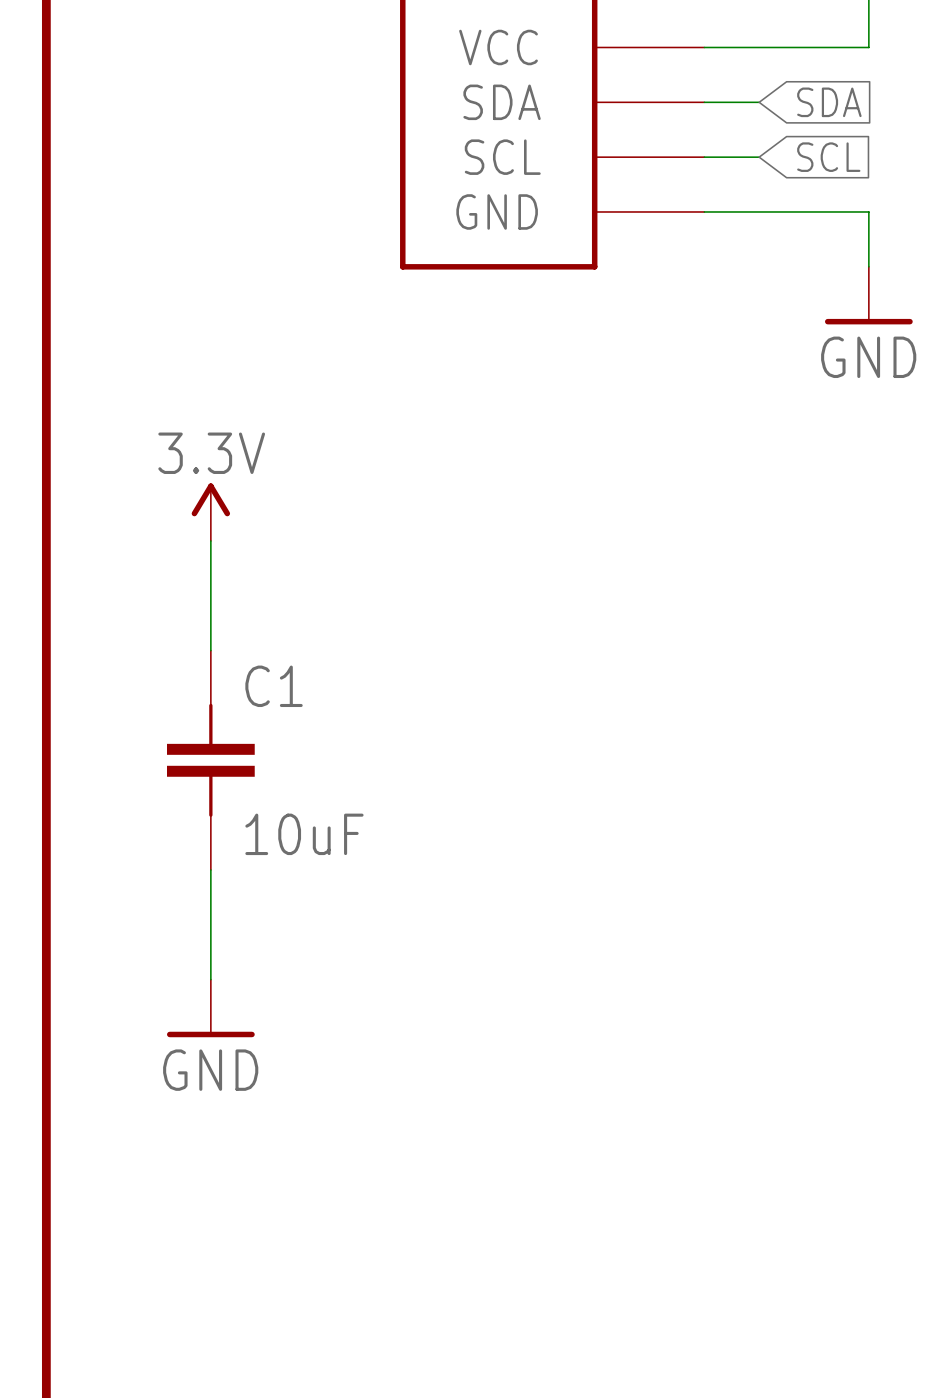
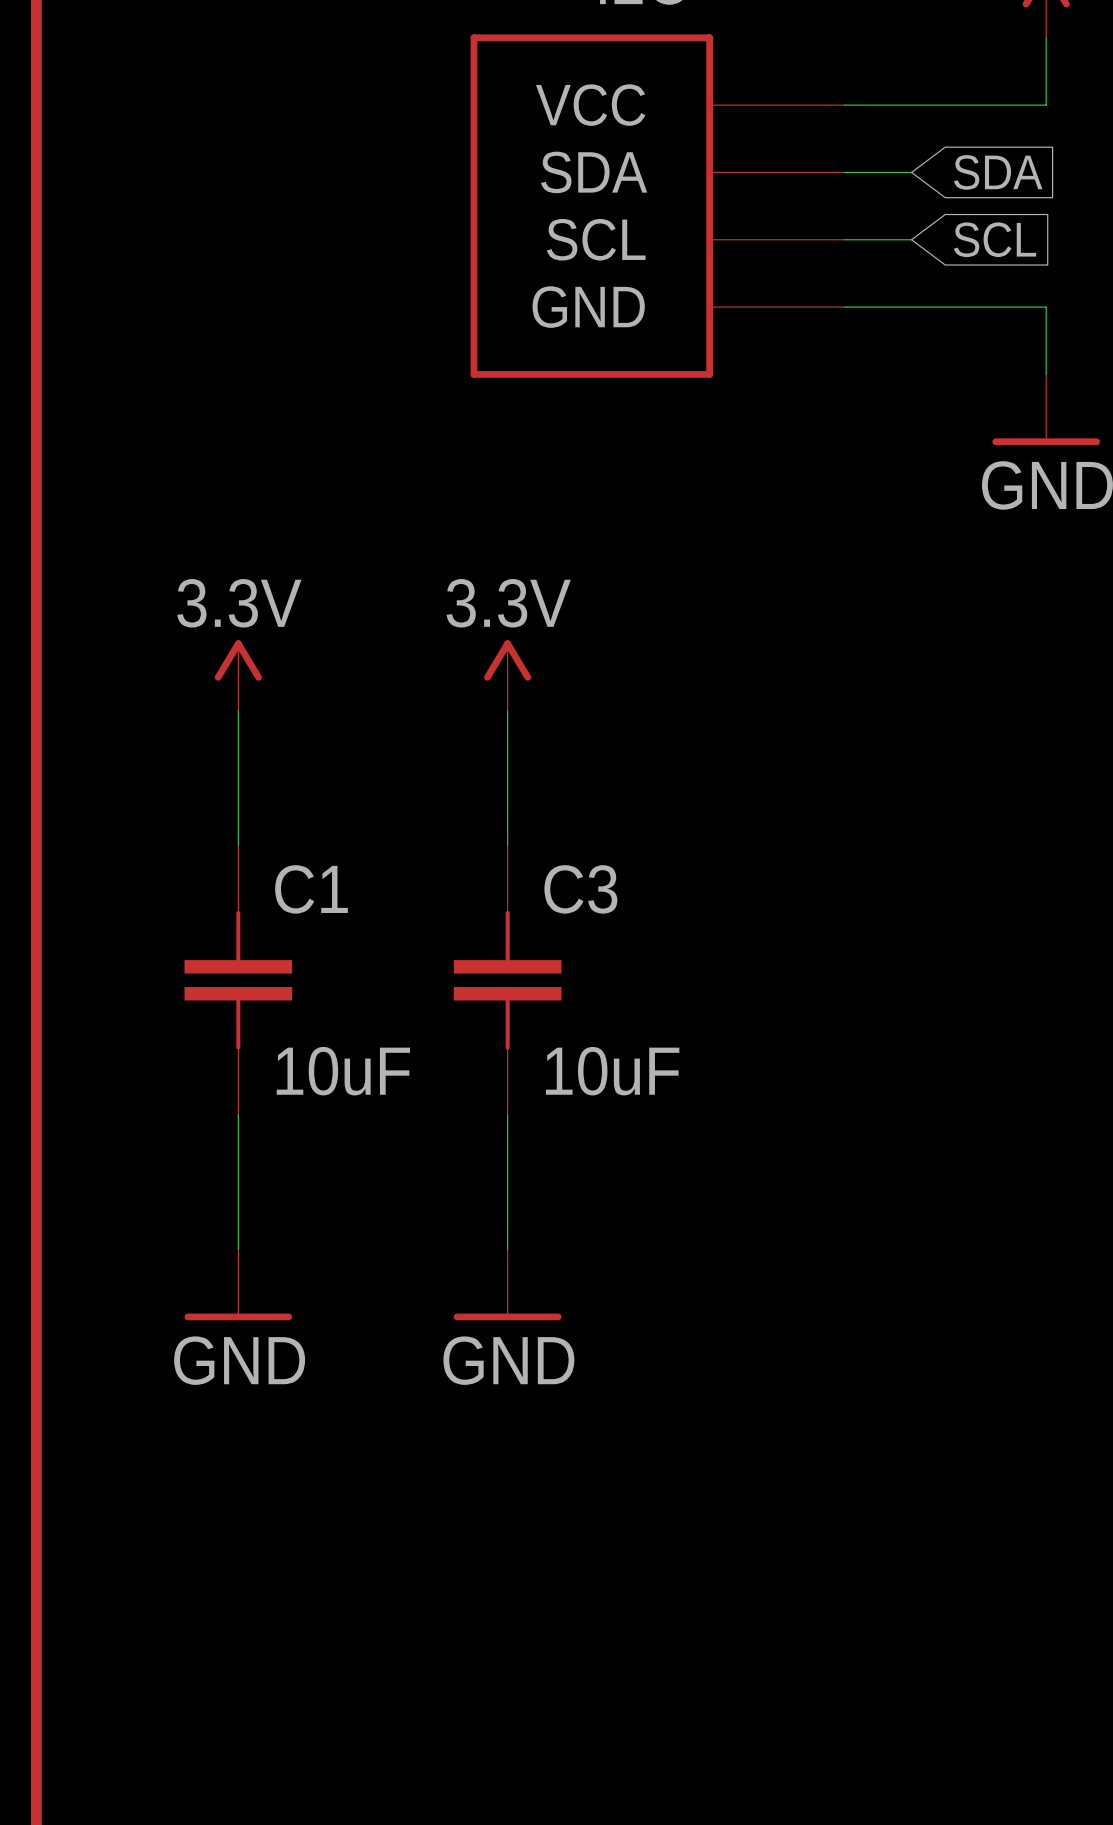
power symbol: none -> 3.3V (507, 675)
wire: none -> (507, 711) (507, 845)
C3: none -> 10uF (507, 980)
wire: none -> (507, 1114) (507, 1249)
power symbol: none -> GND (507, 1284)

